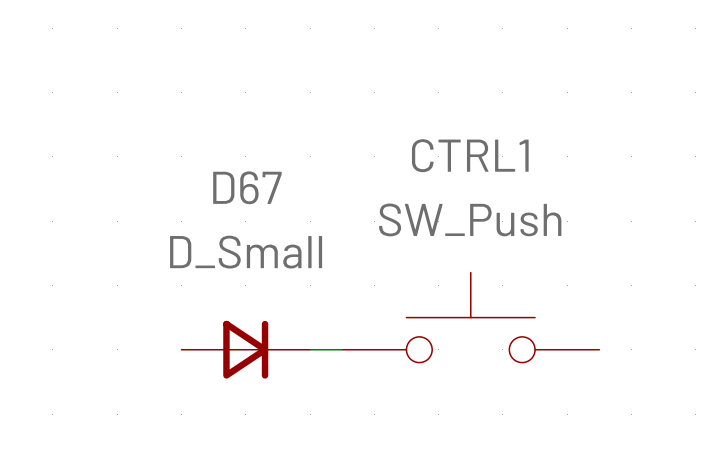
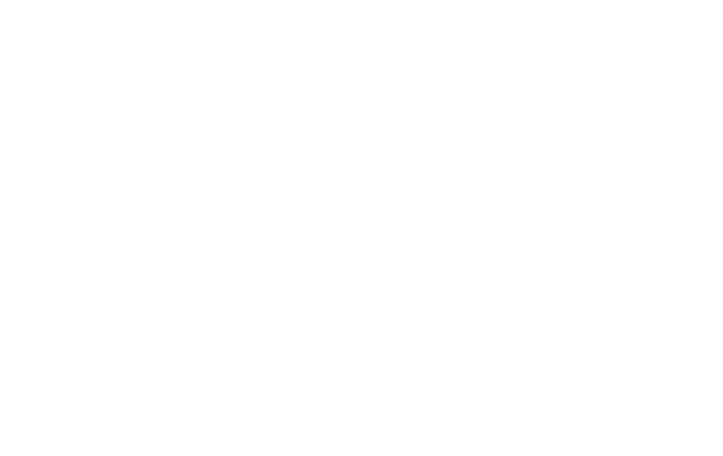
CTRL1: SW_Push (470, 317) -> none
D67: D_Small (245, 349) -> none
wire: (310, 349) (342, 349) -> none

